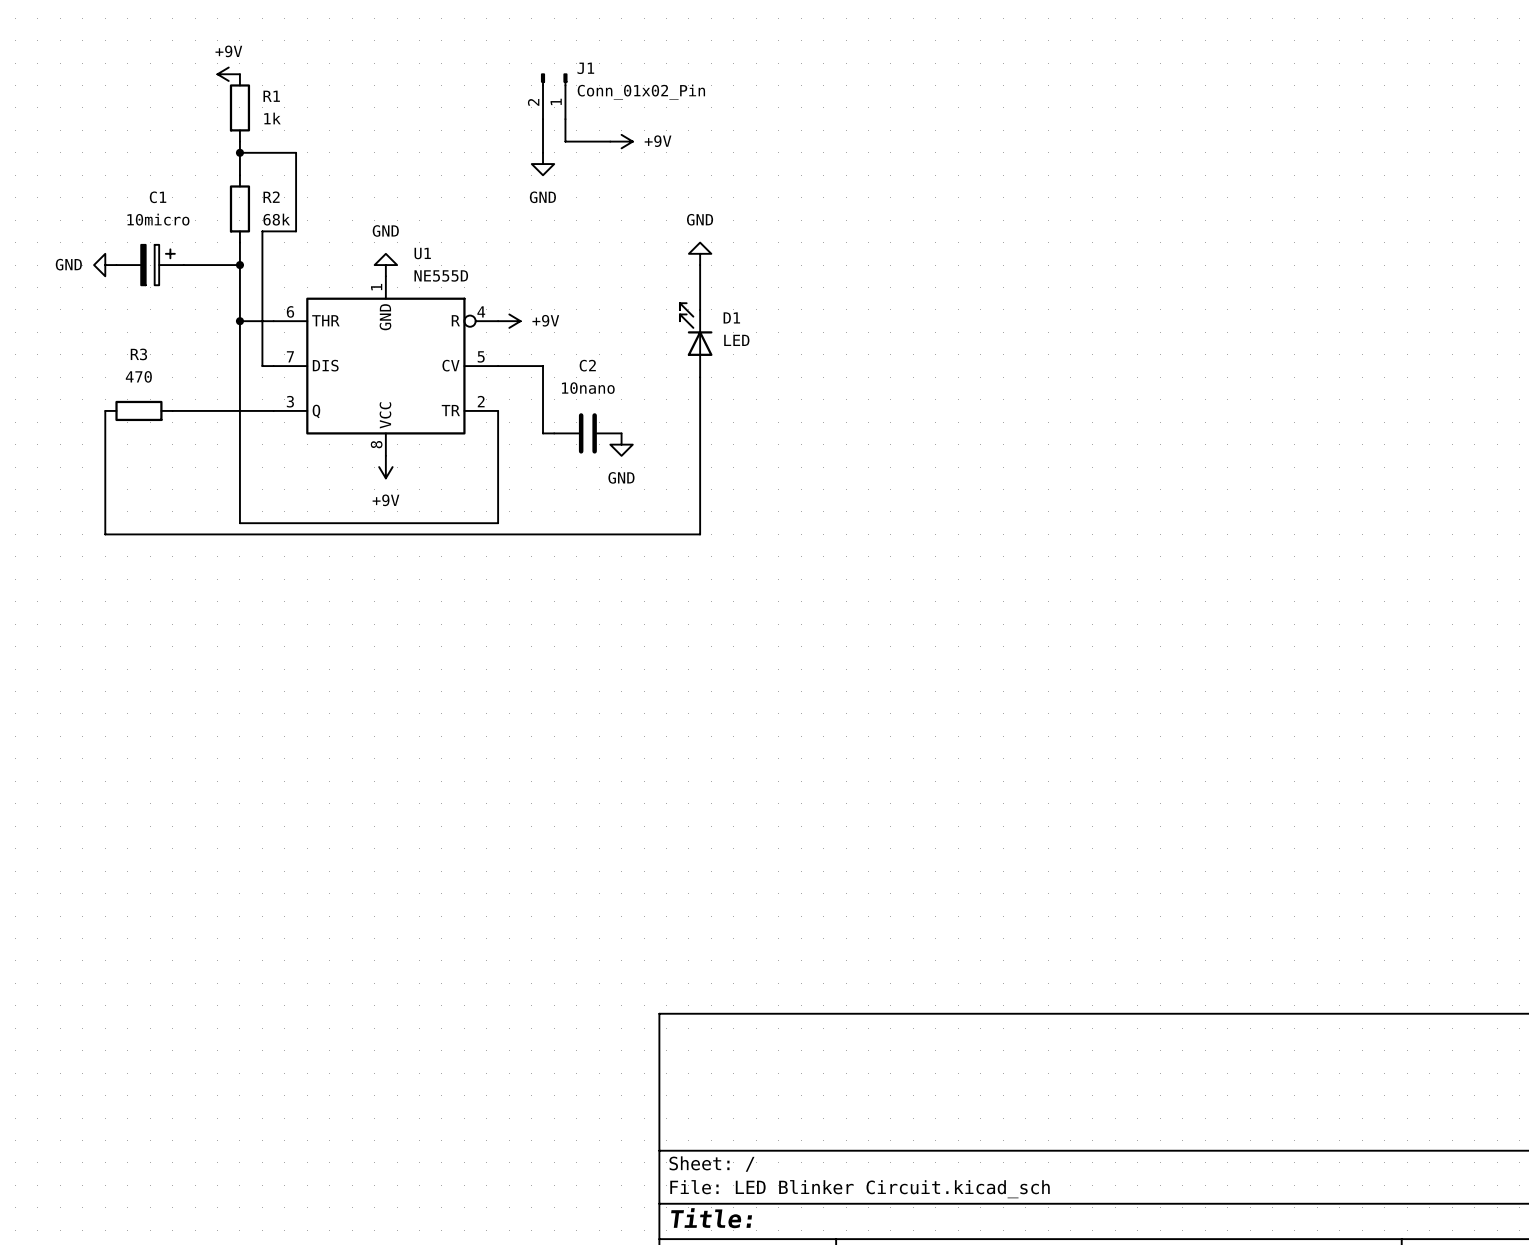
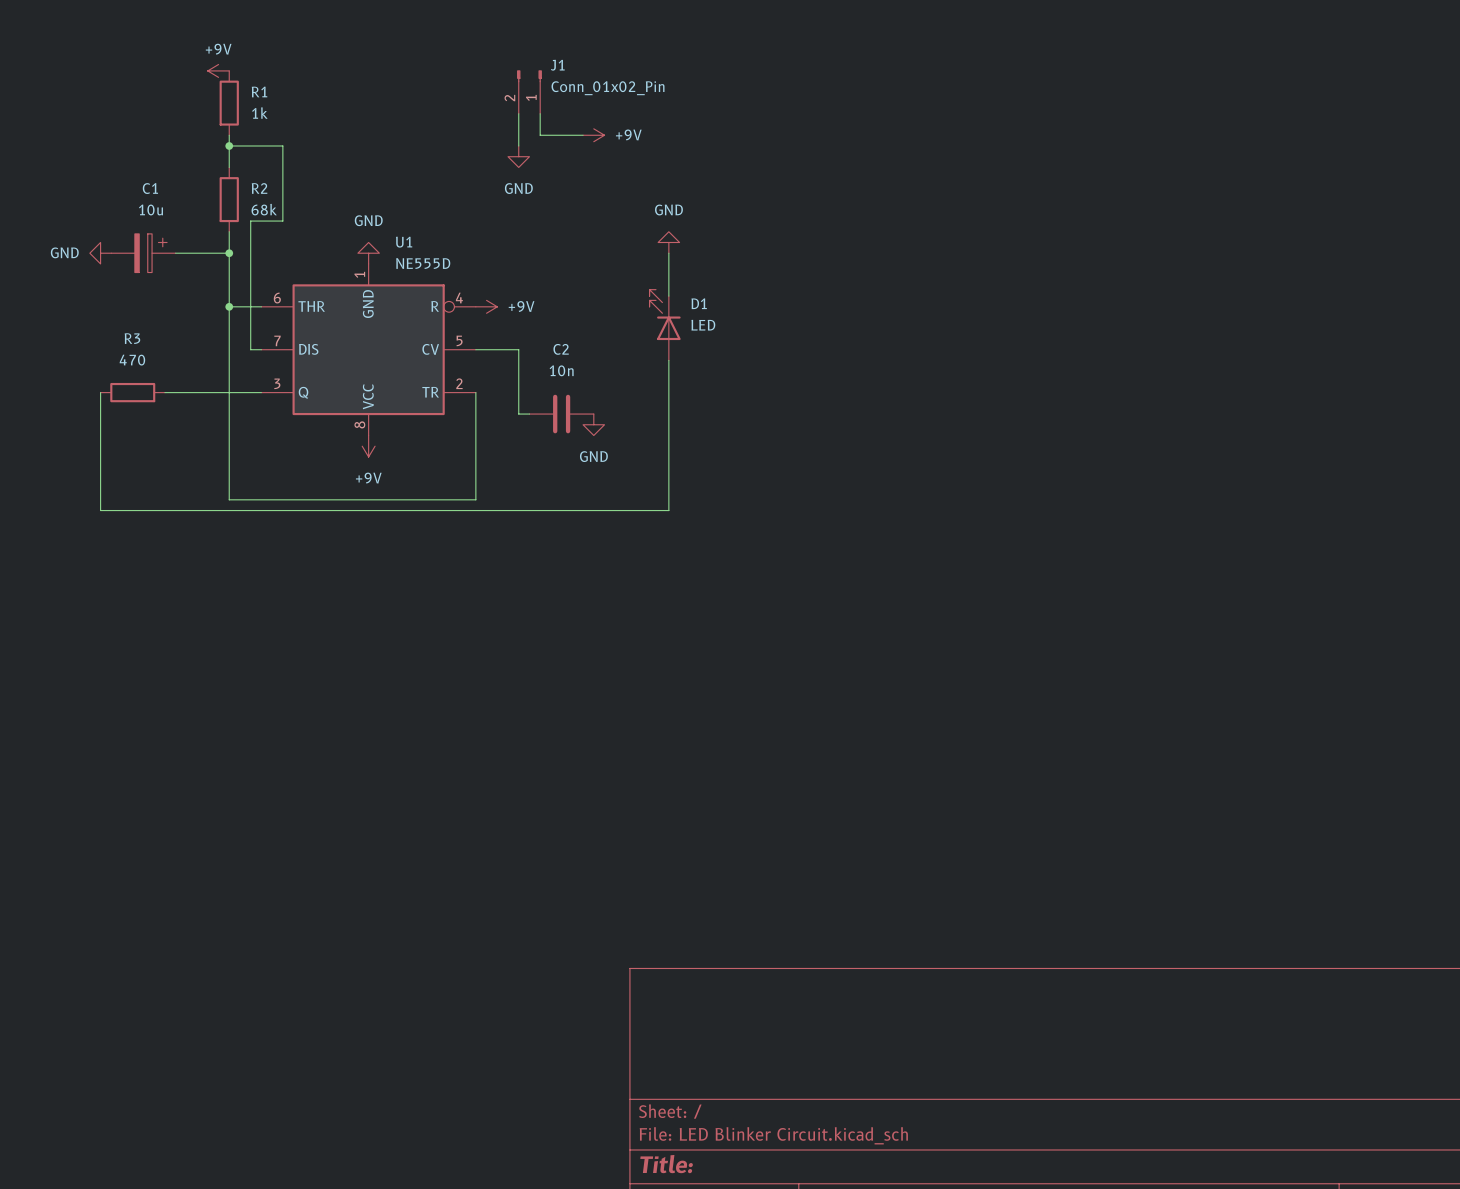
C1 value: 10micro (158, 219) -> 10u (150, 209)
C2 value: 10nano (588, 388) -> 10n (561, 370)

